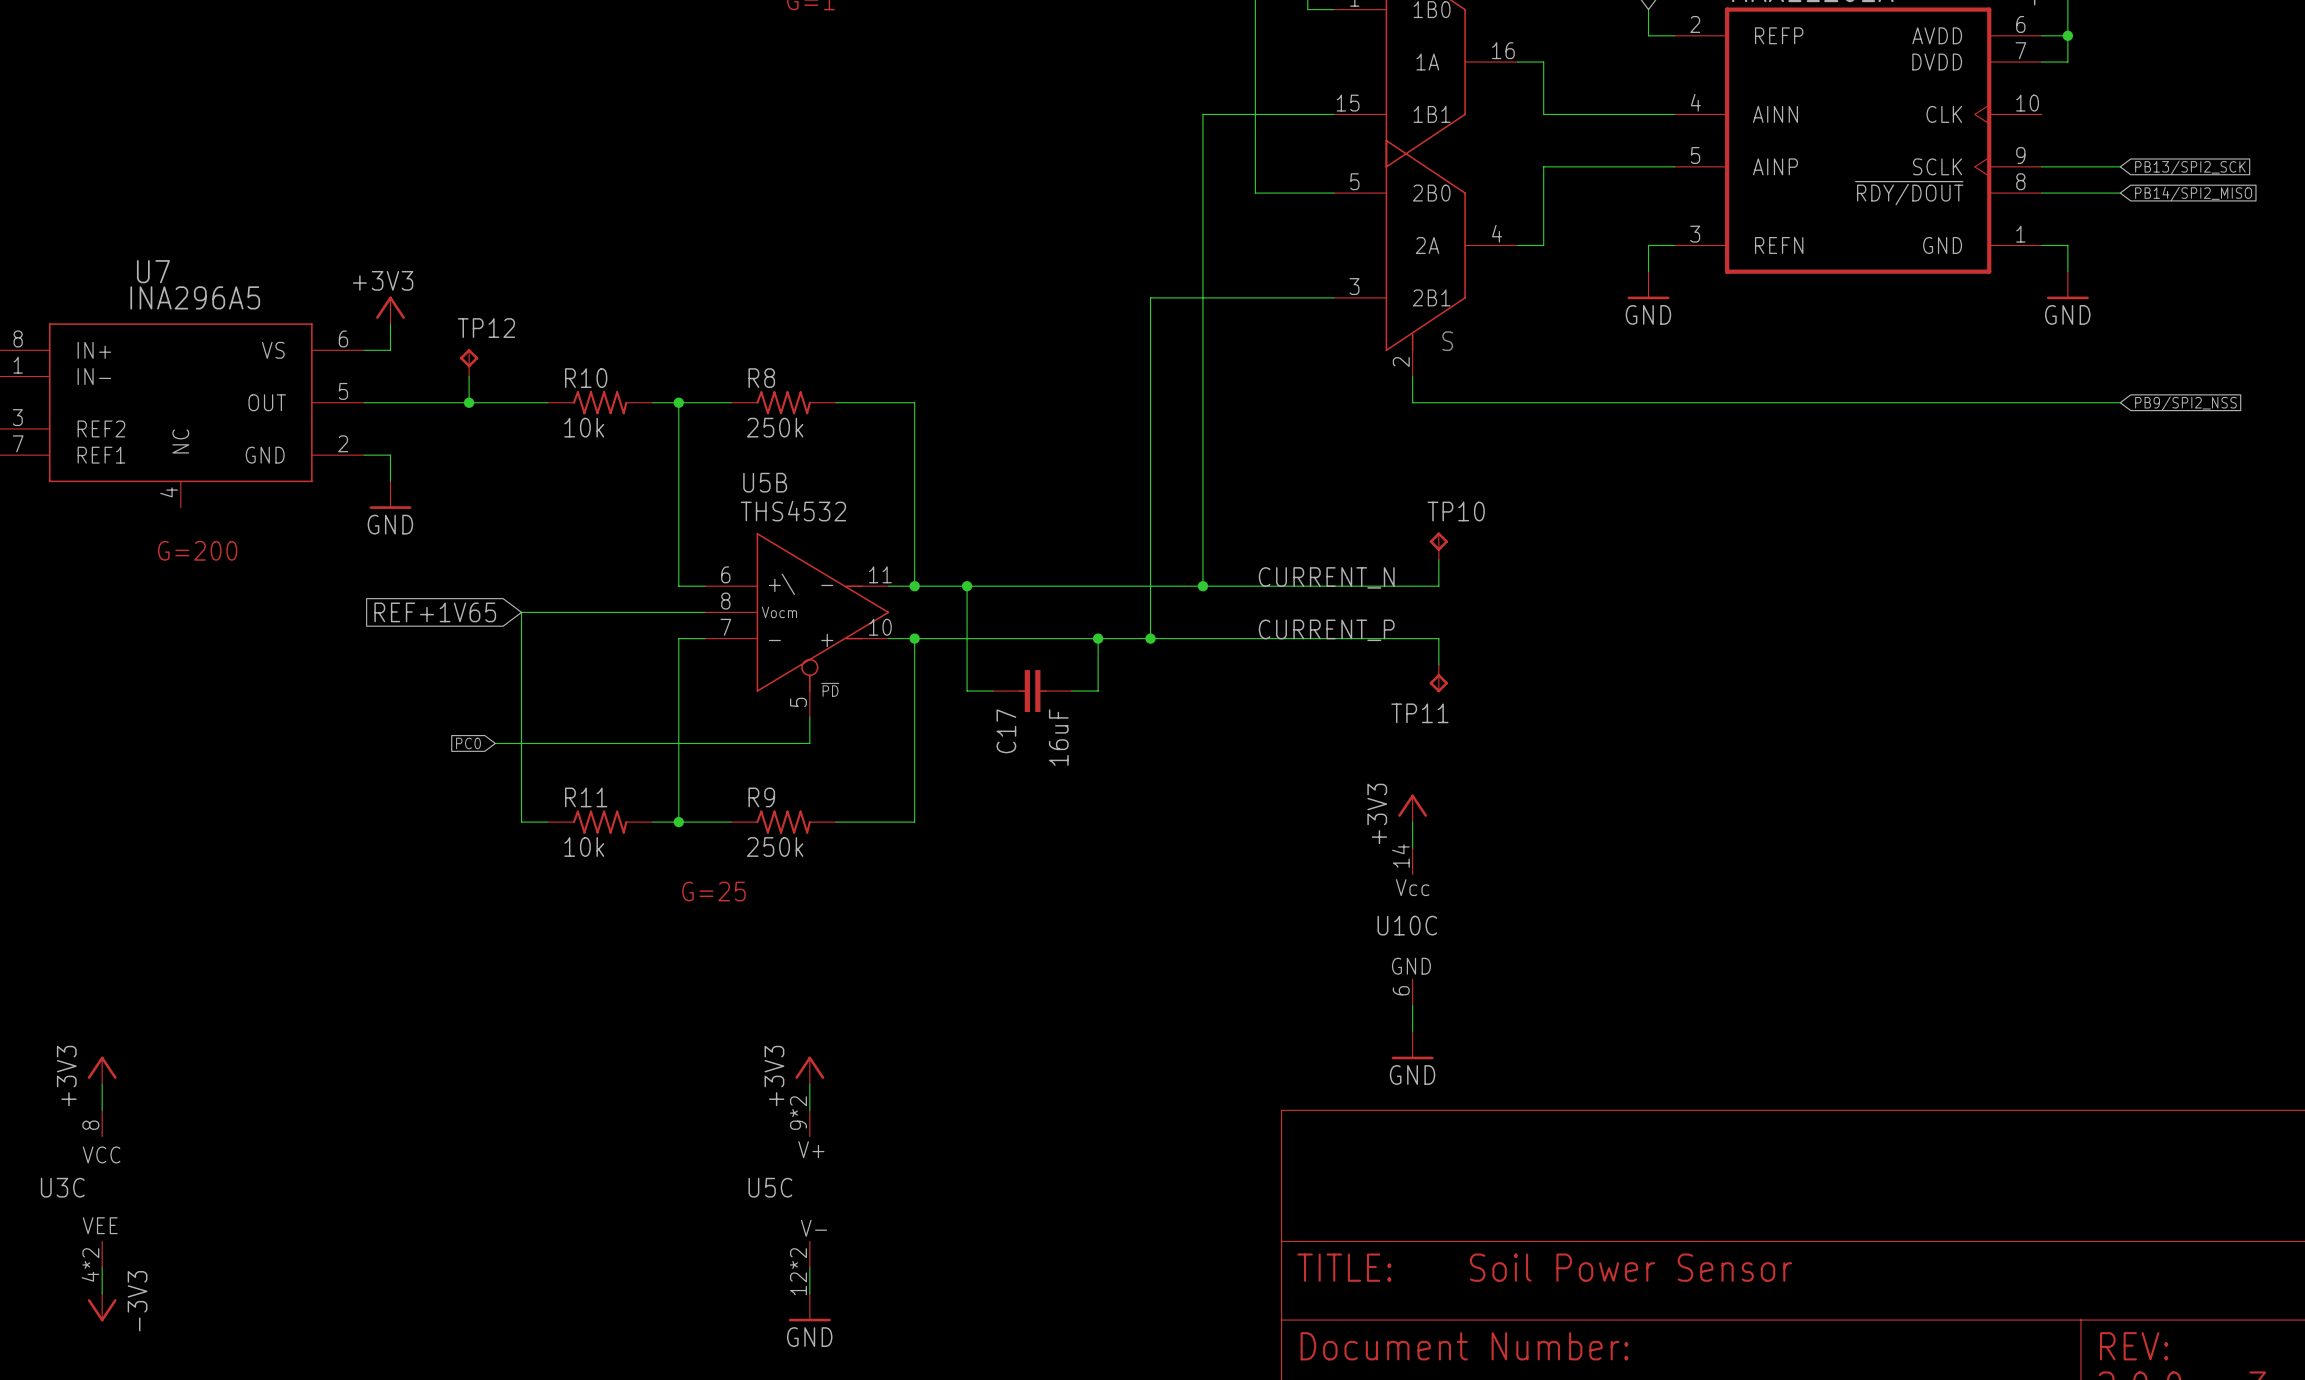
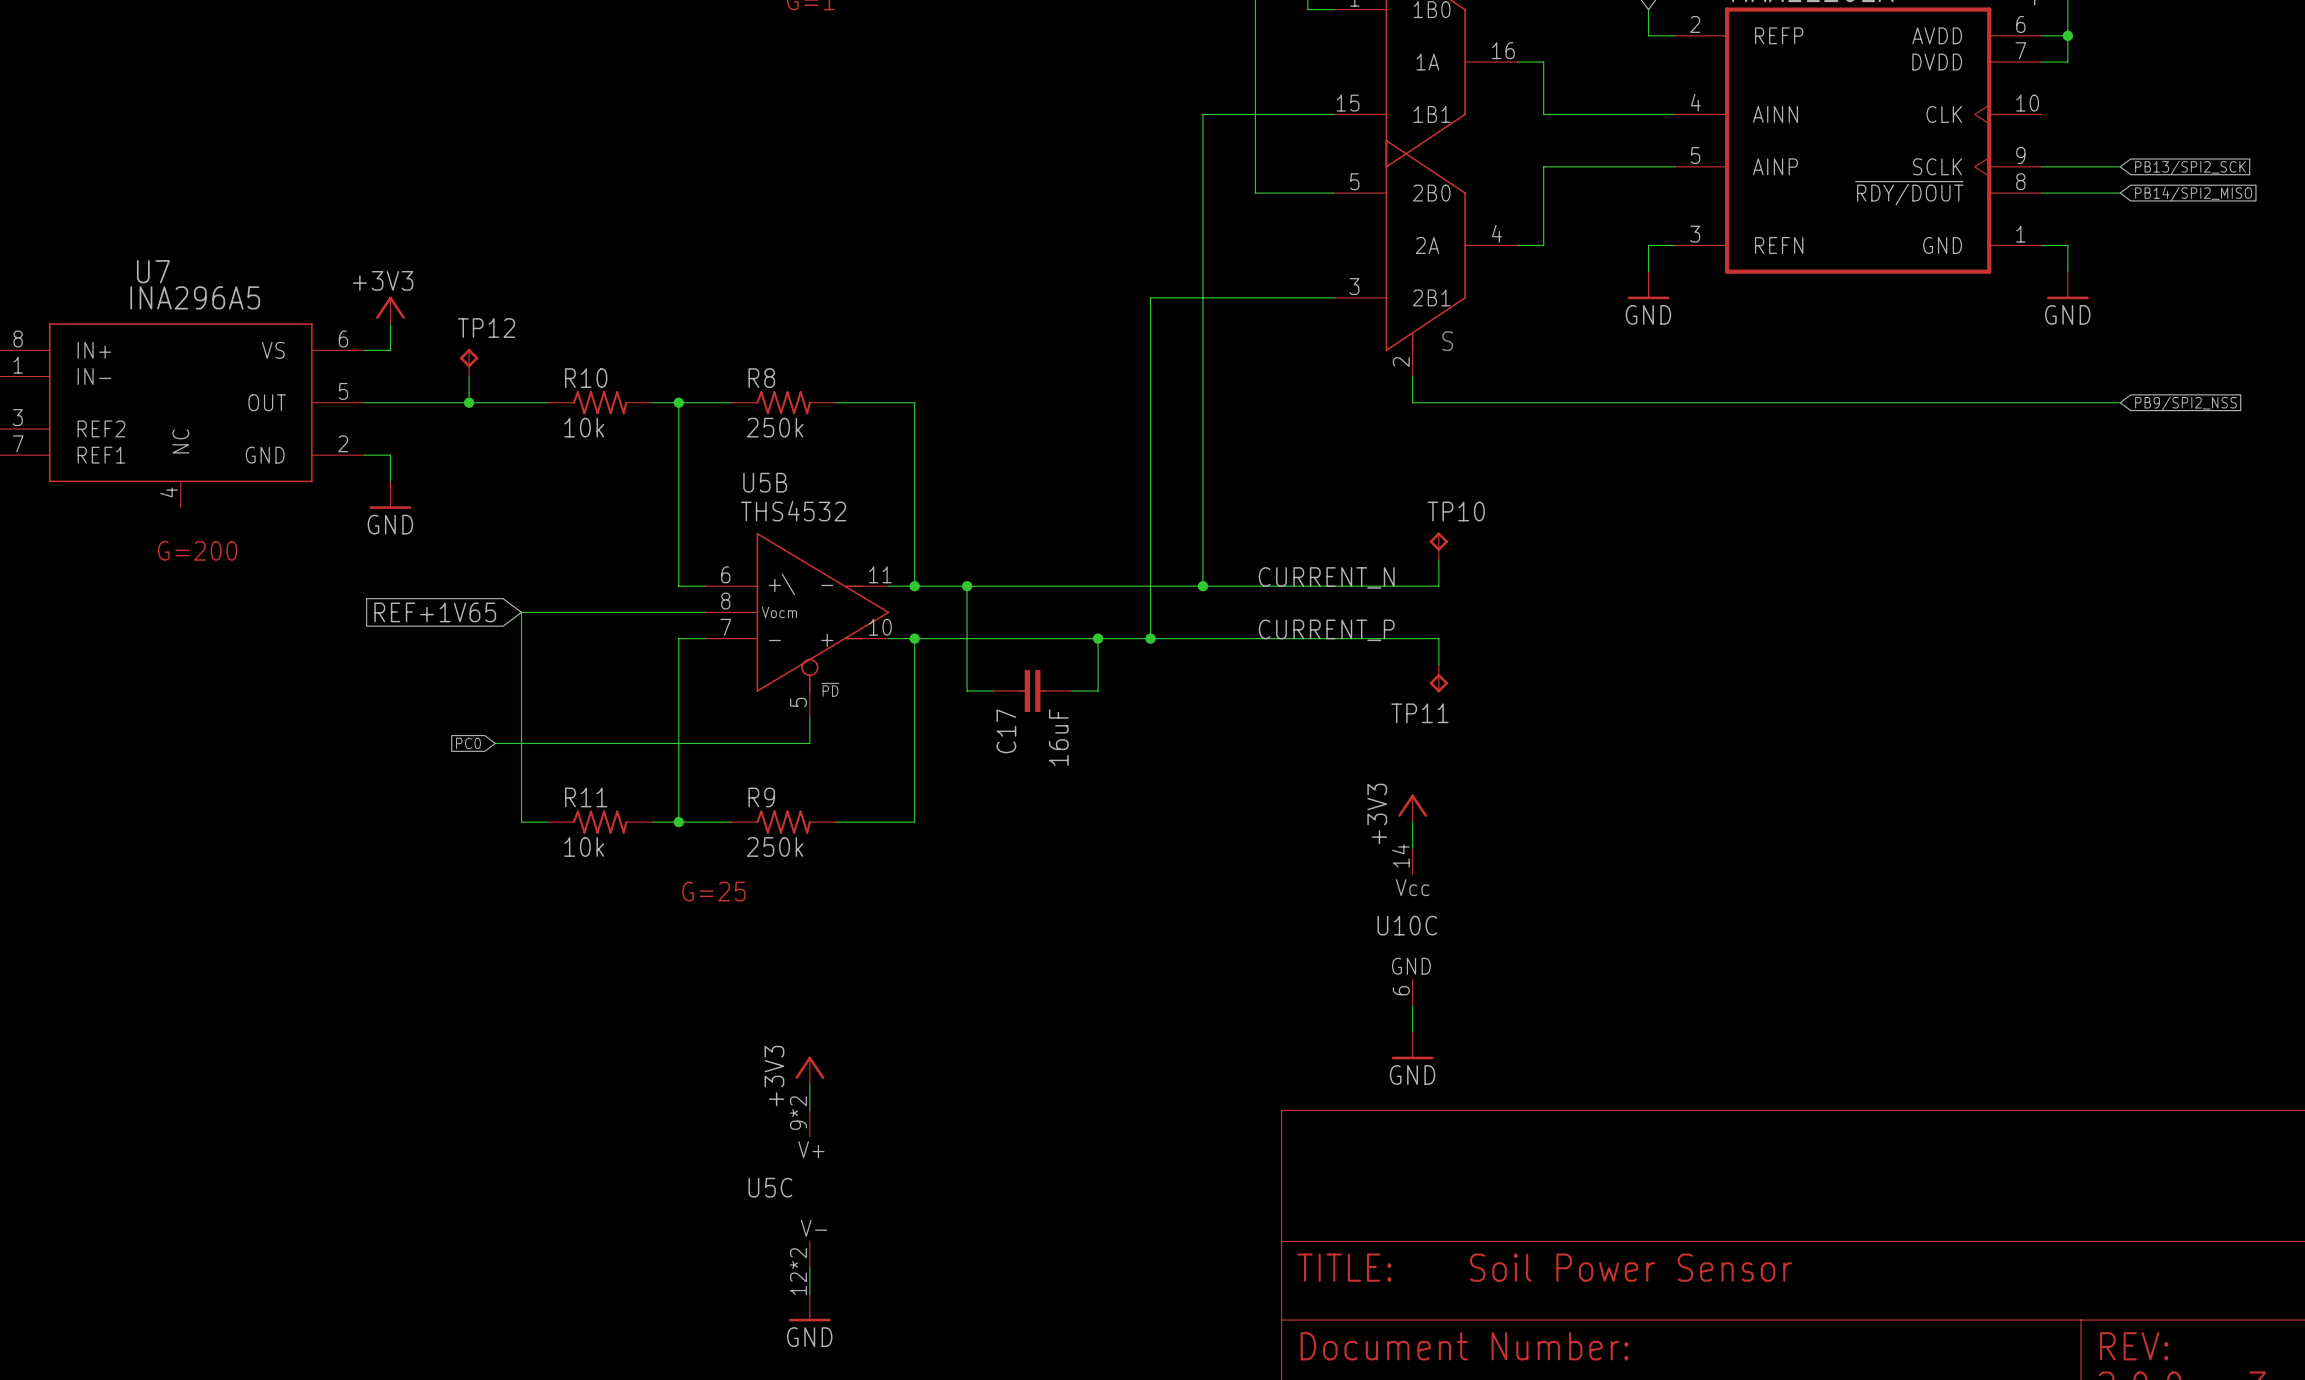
power symbol: +3V3 (102, 1070) -> none
wire: (102, 1084) (102, 1110) -> none
U3C: (102, 1189) -> none
wire: (102, 1267) (102, 1293) -> none
power symbol: -3V3 (102, 1307) -> none

